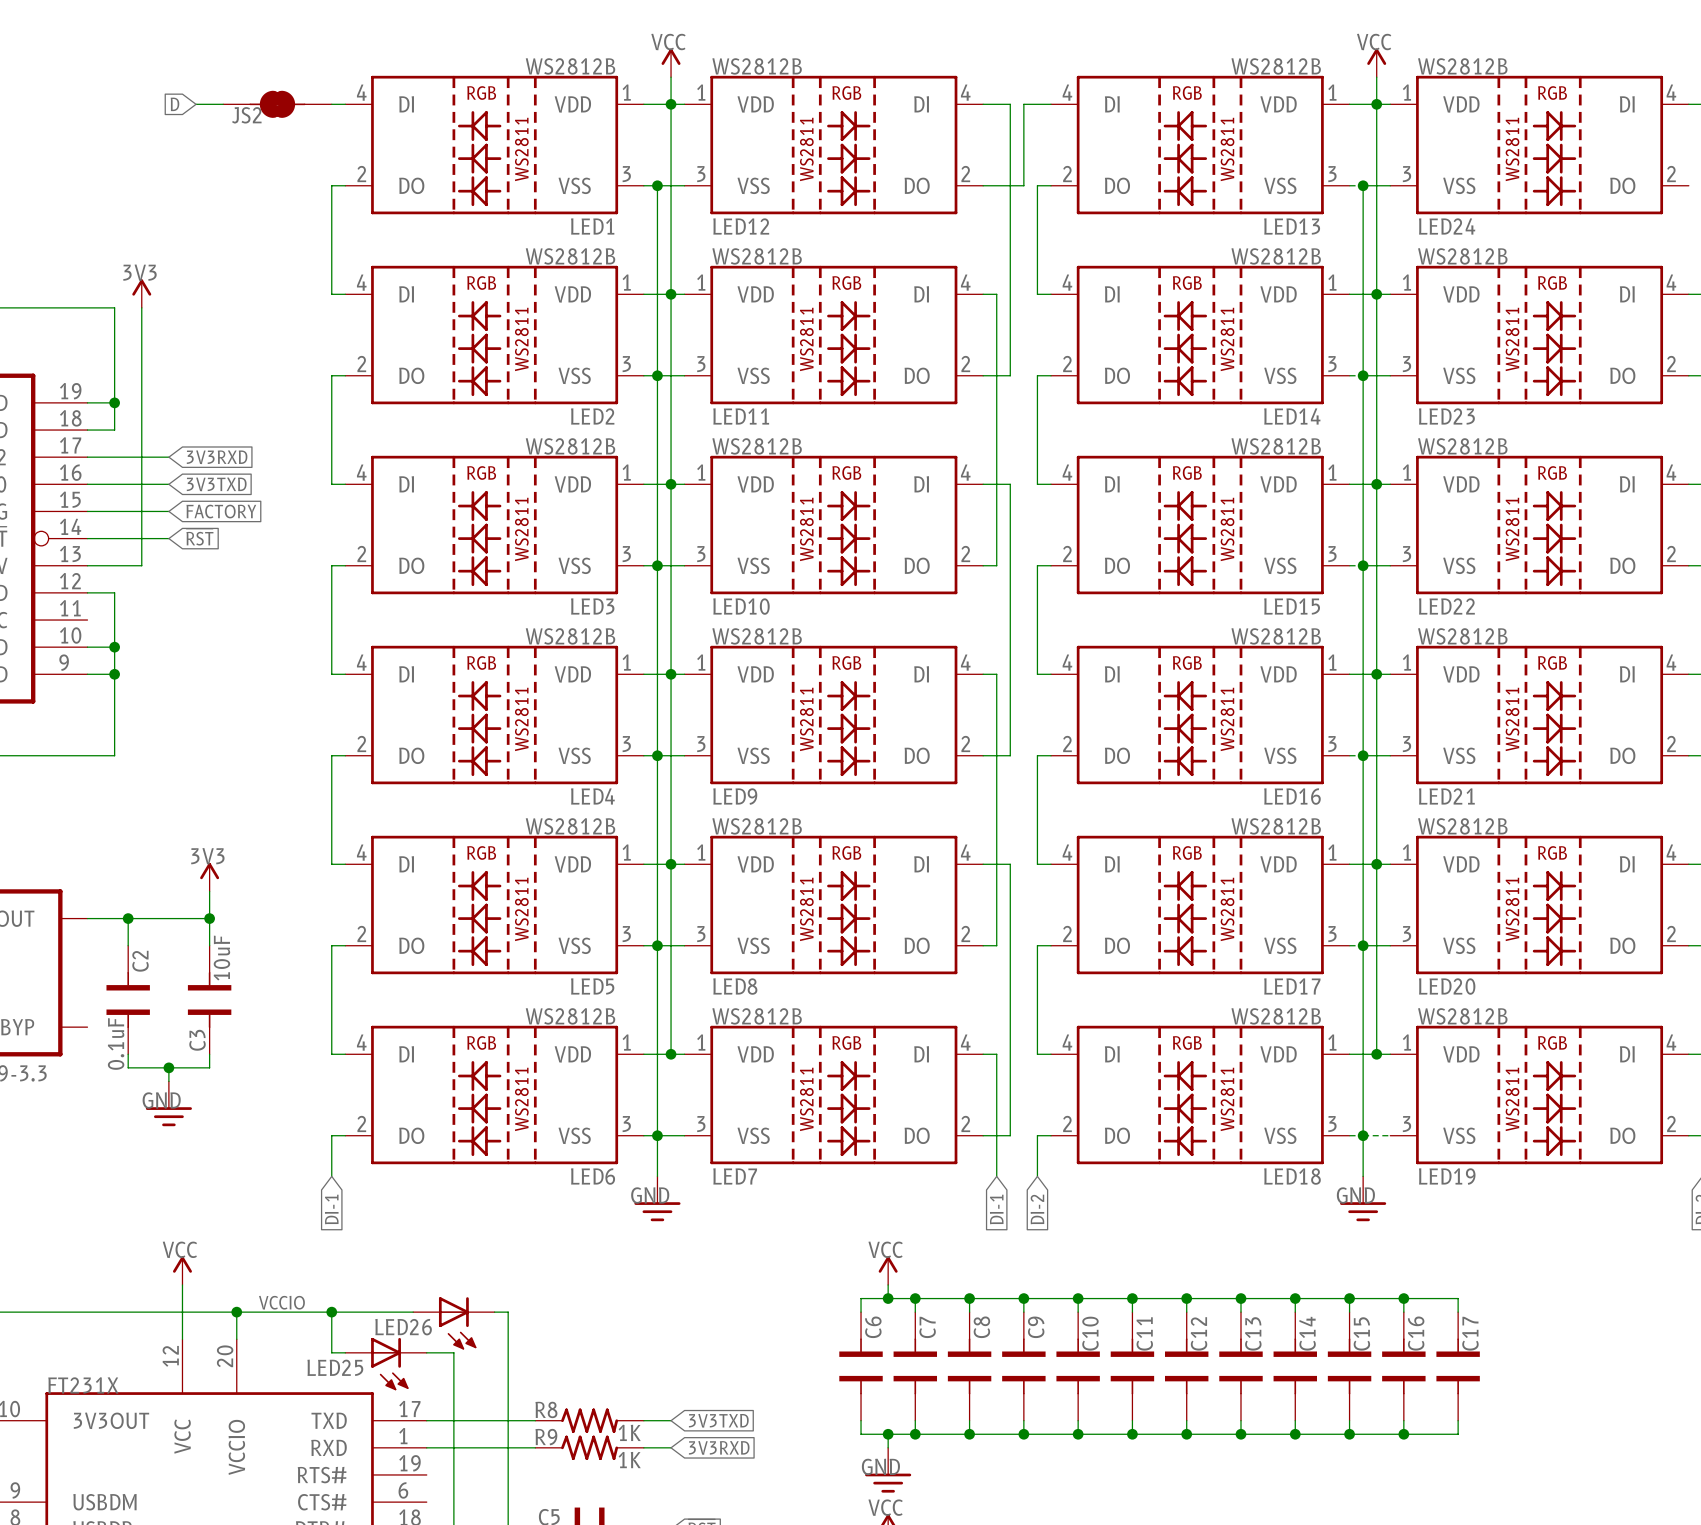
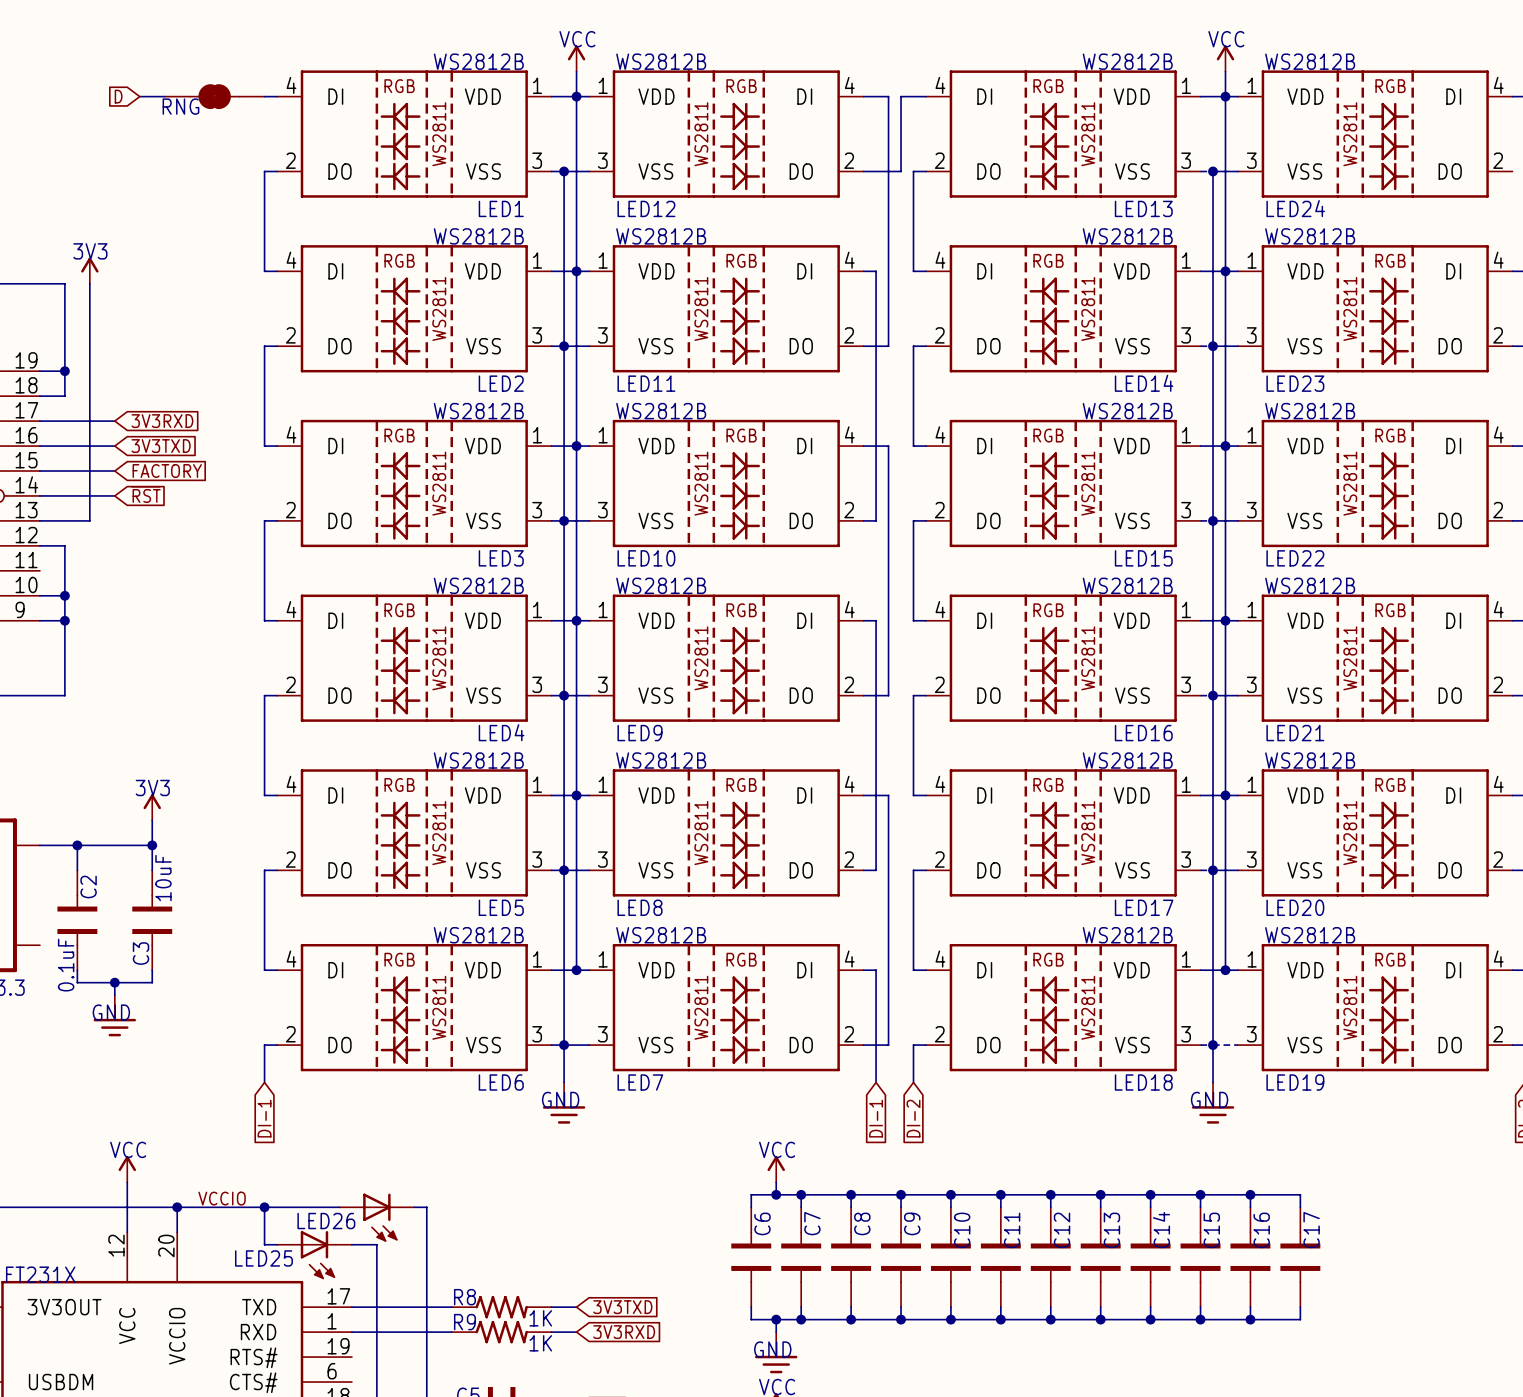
JS2 name: JS2 (246, 115) -> RNG (180, 106)

